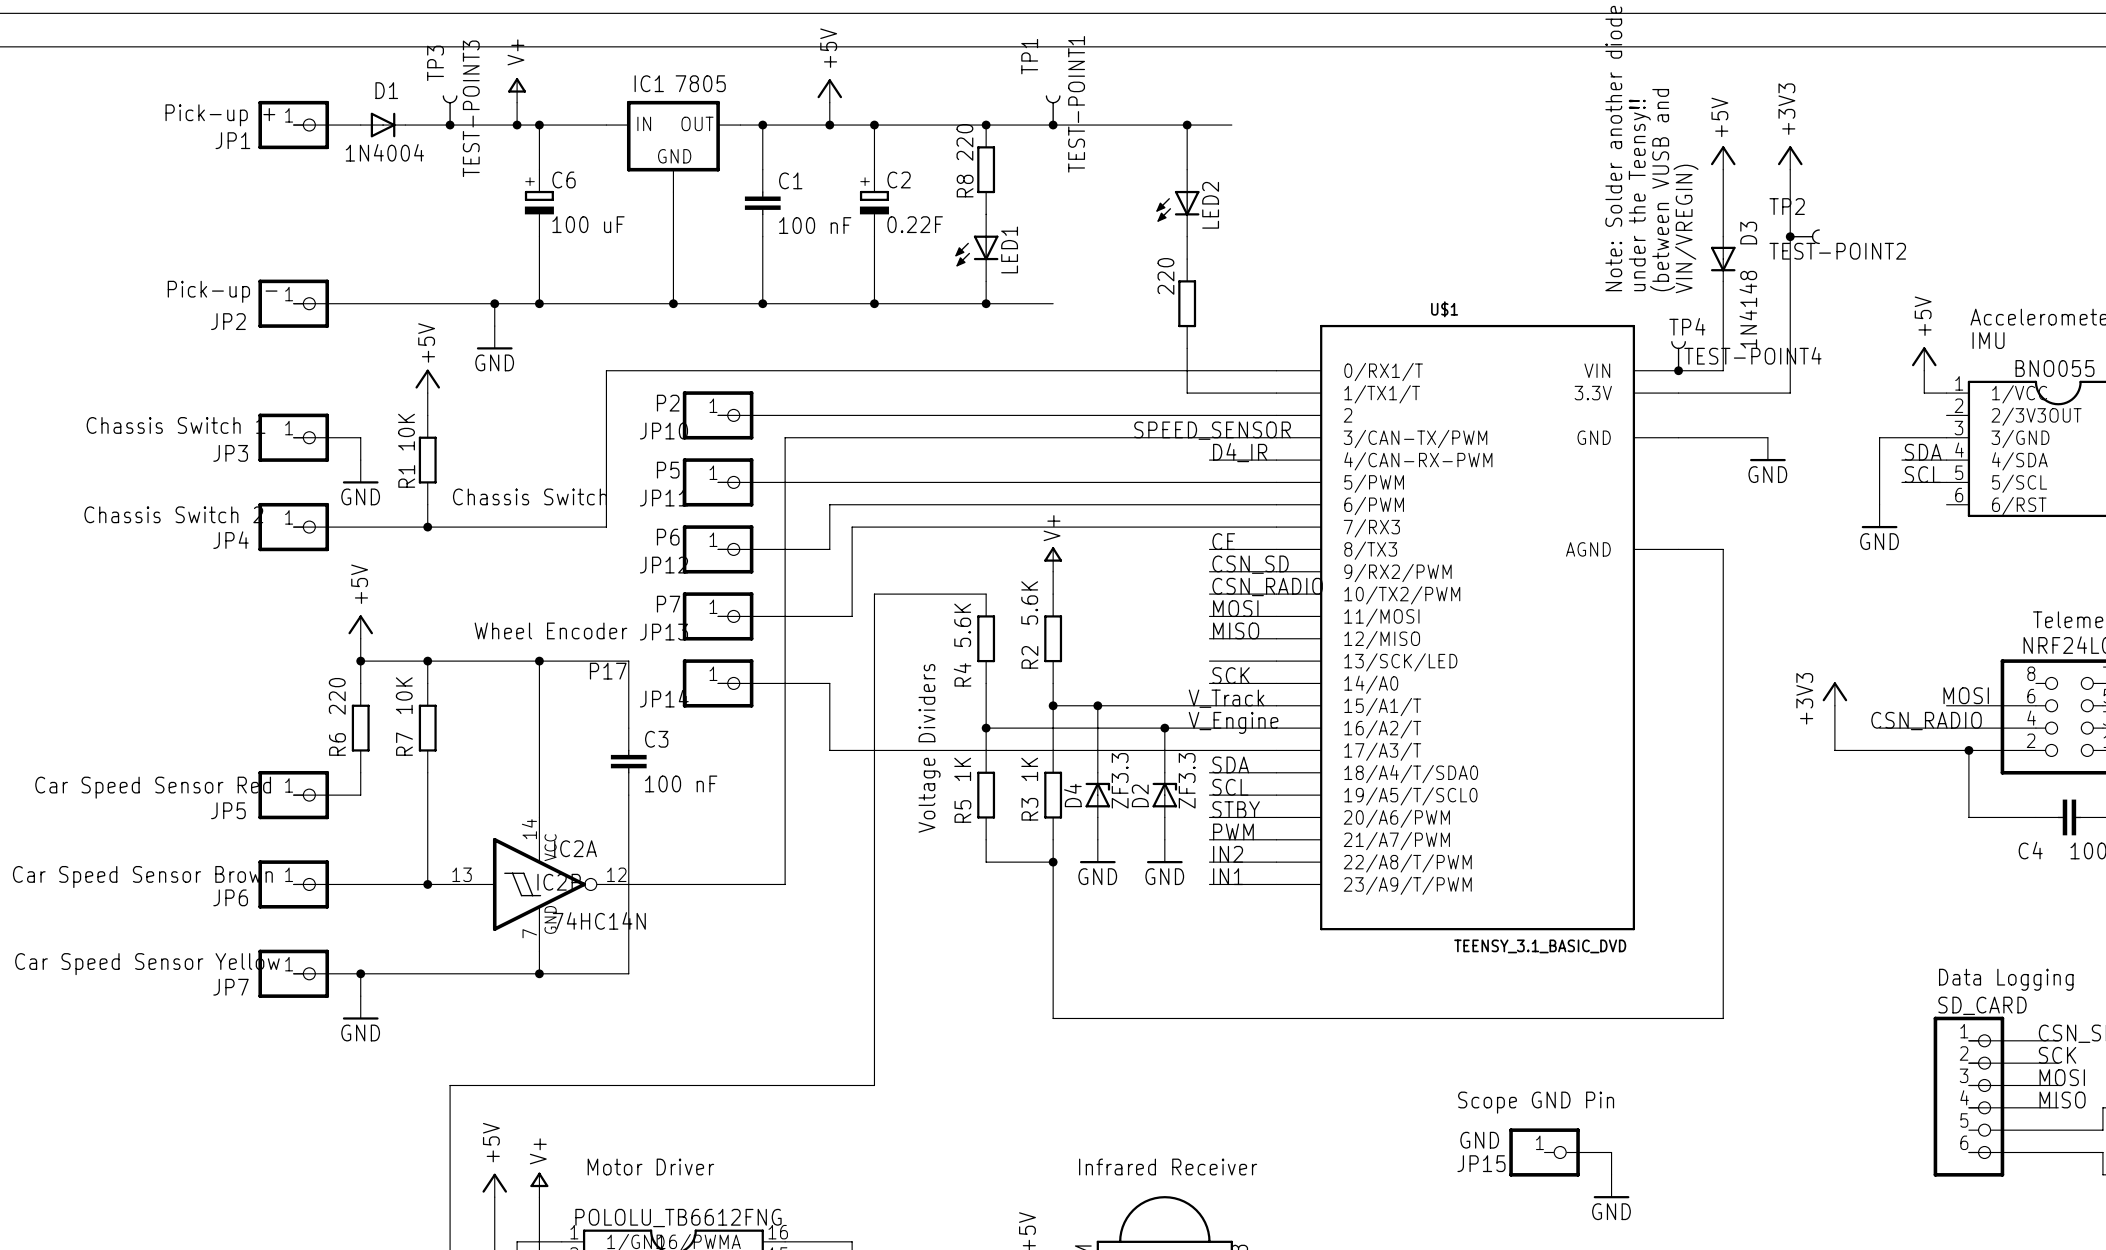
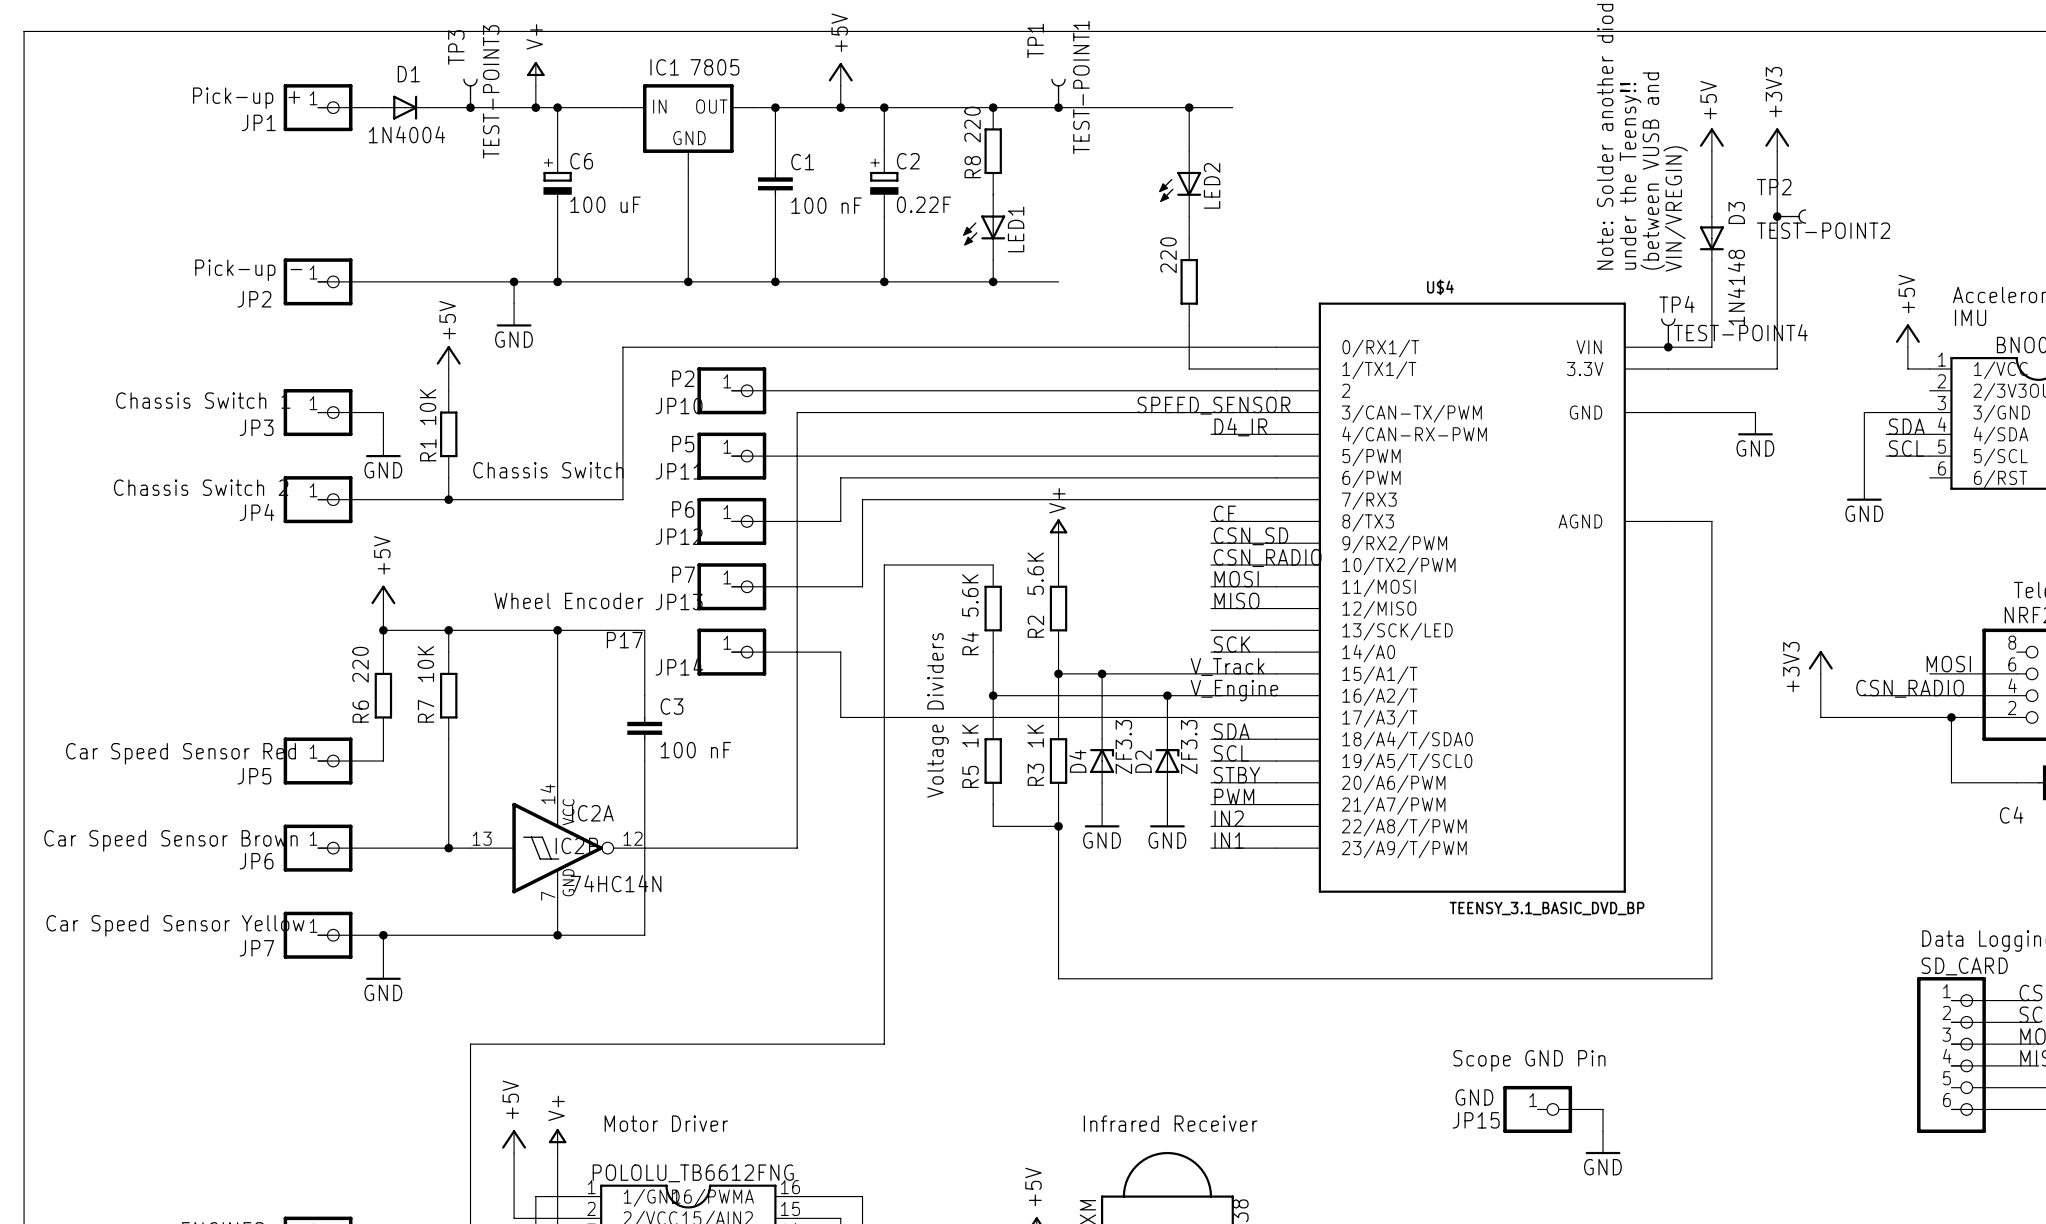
U$1 name: U$1 (1444, 309) -> U$4 (1440, 287)
U$1 value: TEENSY_3.1_BASIC_DVD (1540, 946) -> TEENSY_3.1_BASIC_DVD_BP (1546, 908)

